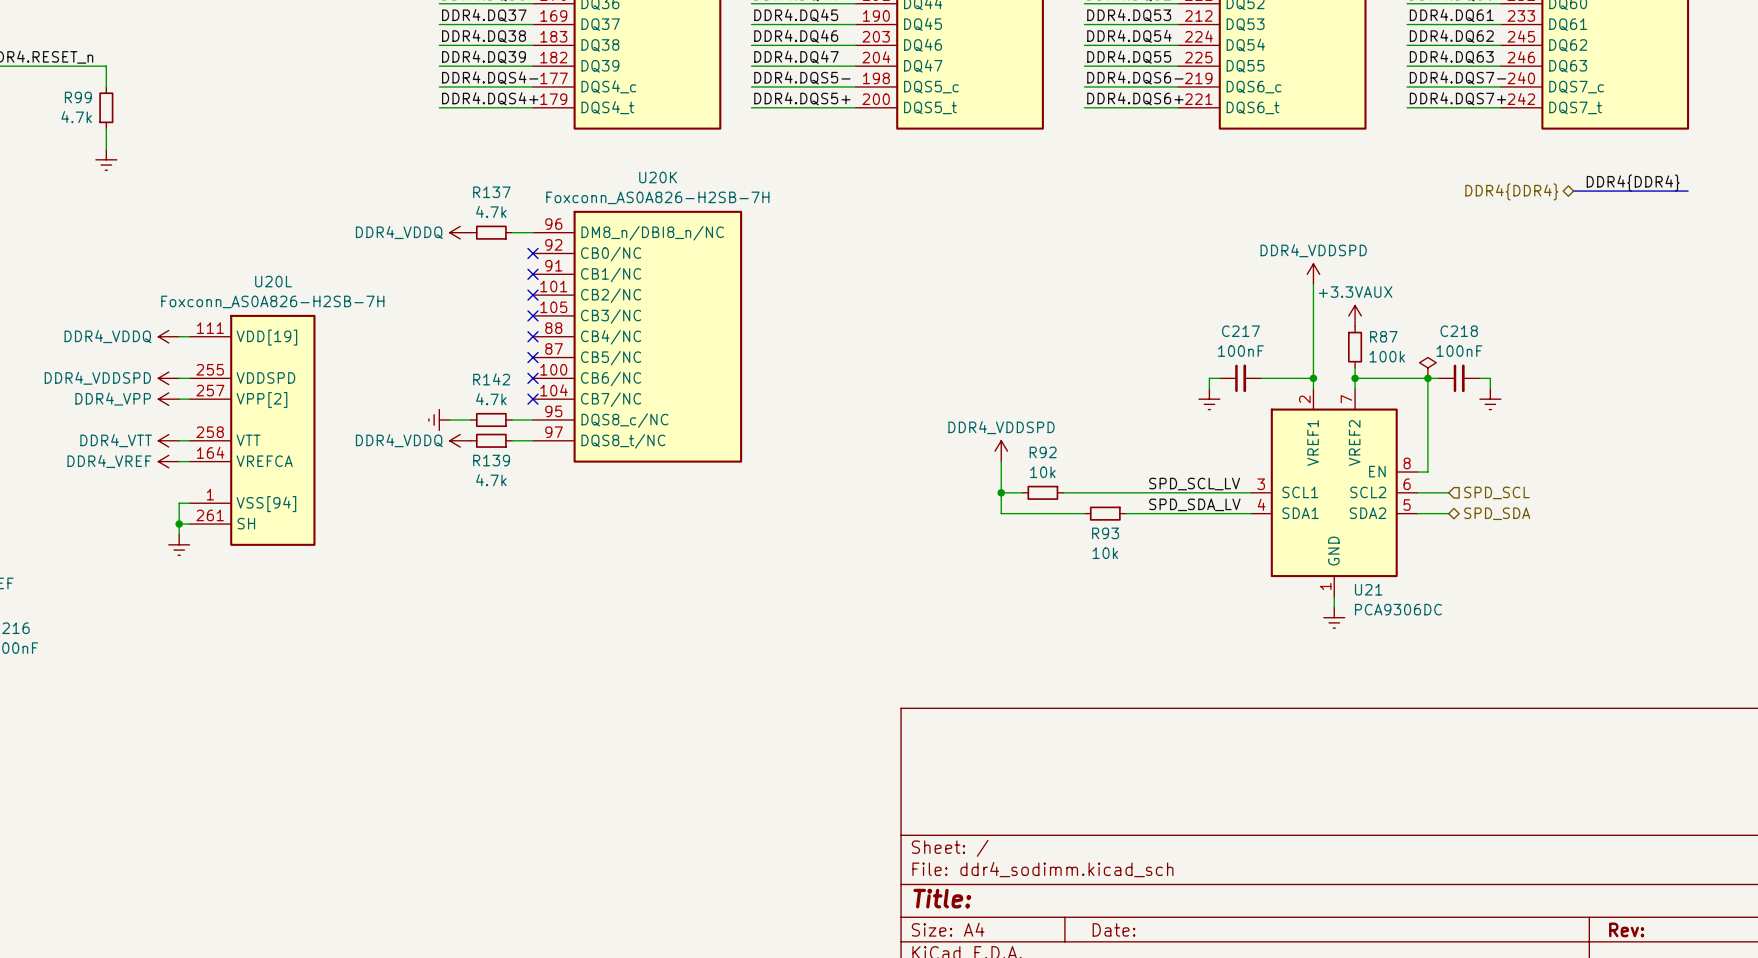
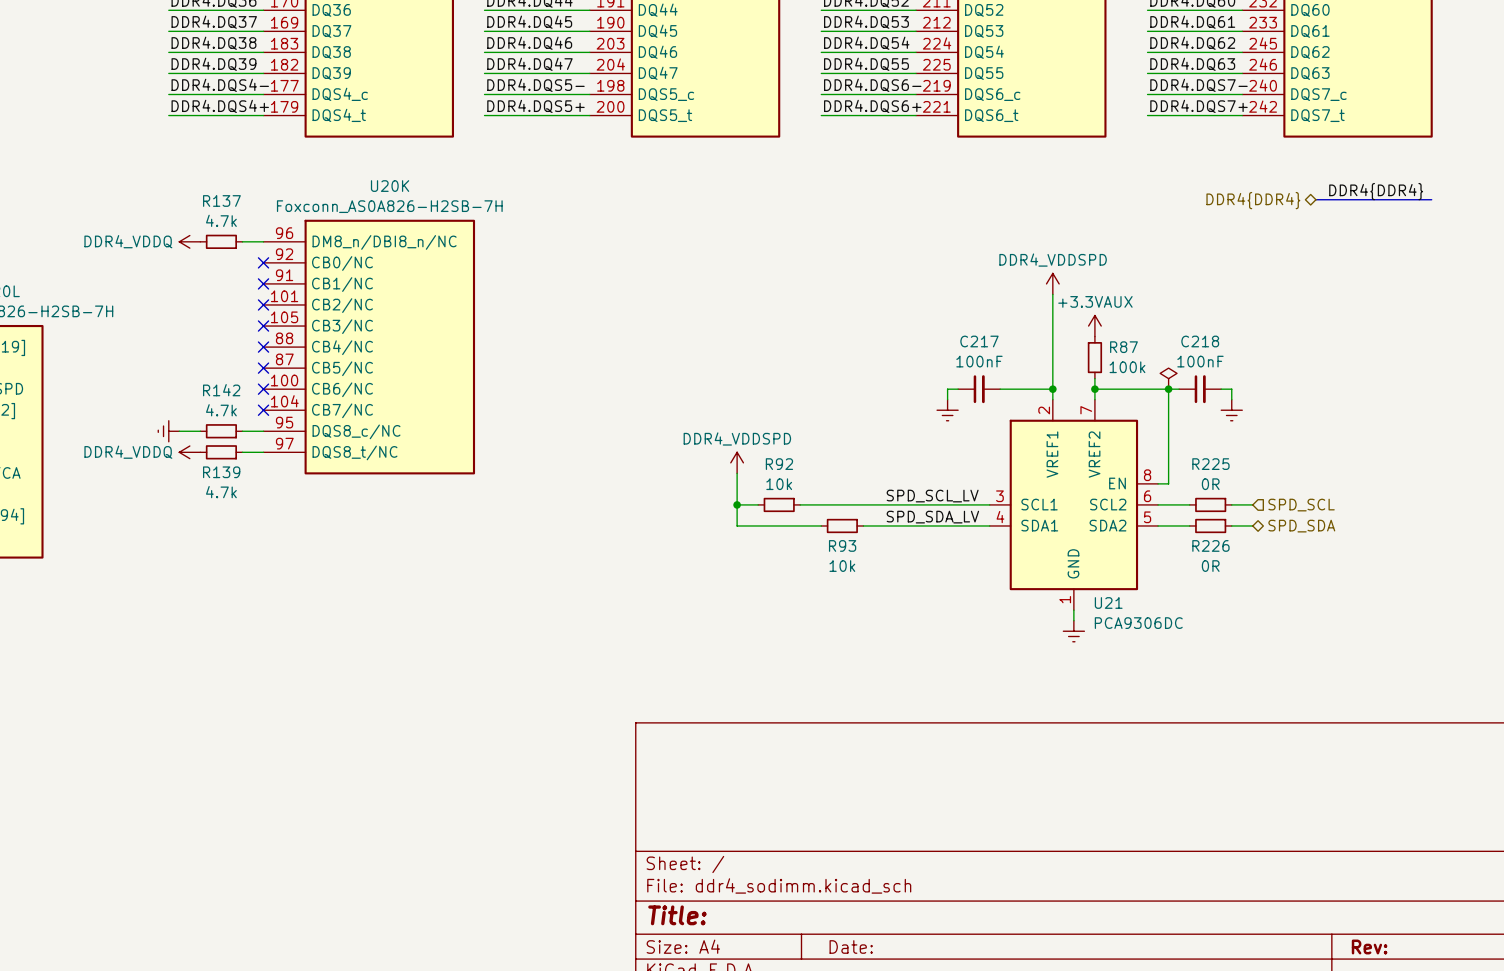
R225: none -> 0R (1210, 504)
wire: none -> (1231, 504) (1252, 504)
hierarchical label position: SPD_SCL (1496, 492) -> SPD_SCL (1301, 505)
R226: none -> 0R (1210, 525)
wire: none -> (1231, 525) (1252, 525)
hierarchical label position: SPD_SDA (1497, 513) -> SPD_SDA (1301, 526)

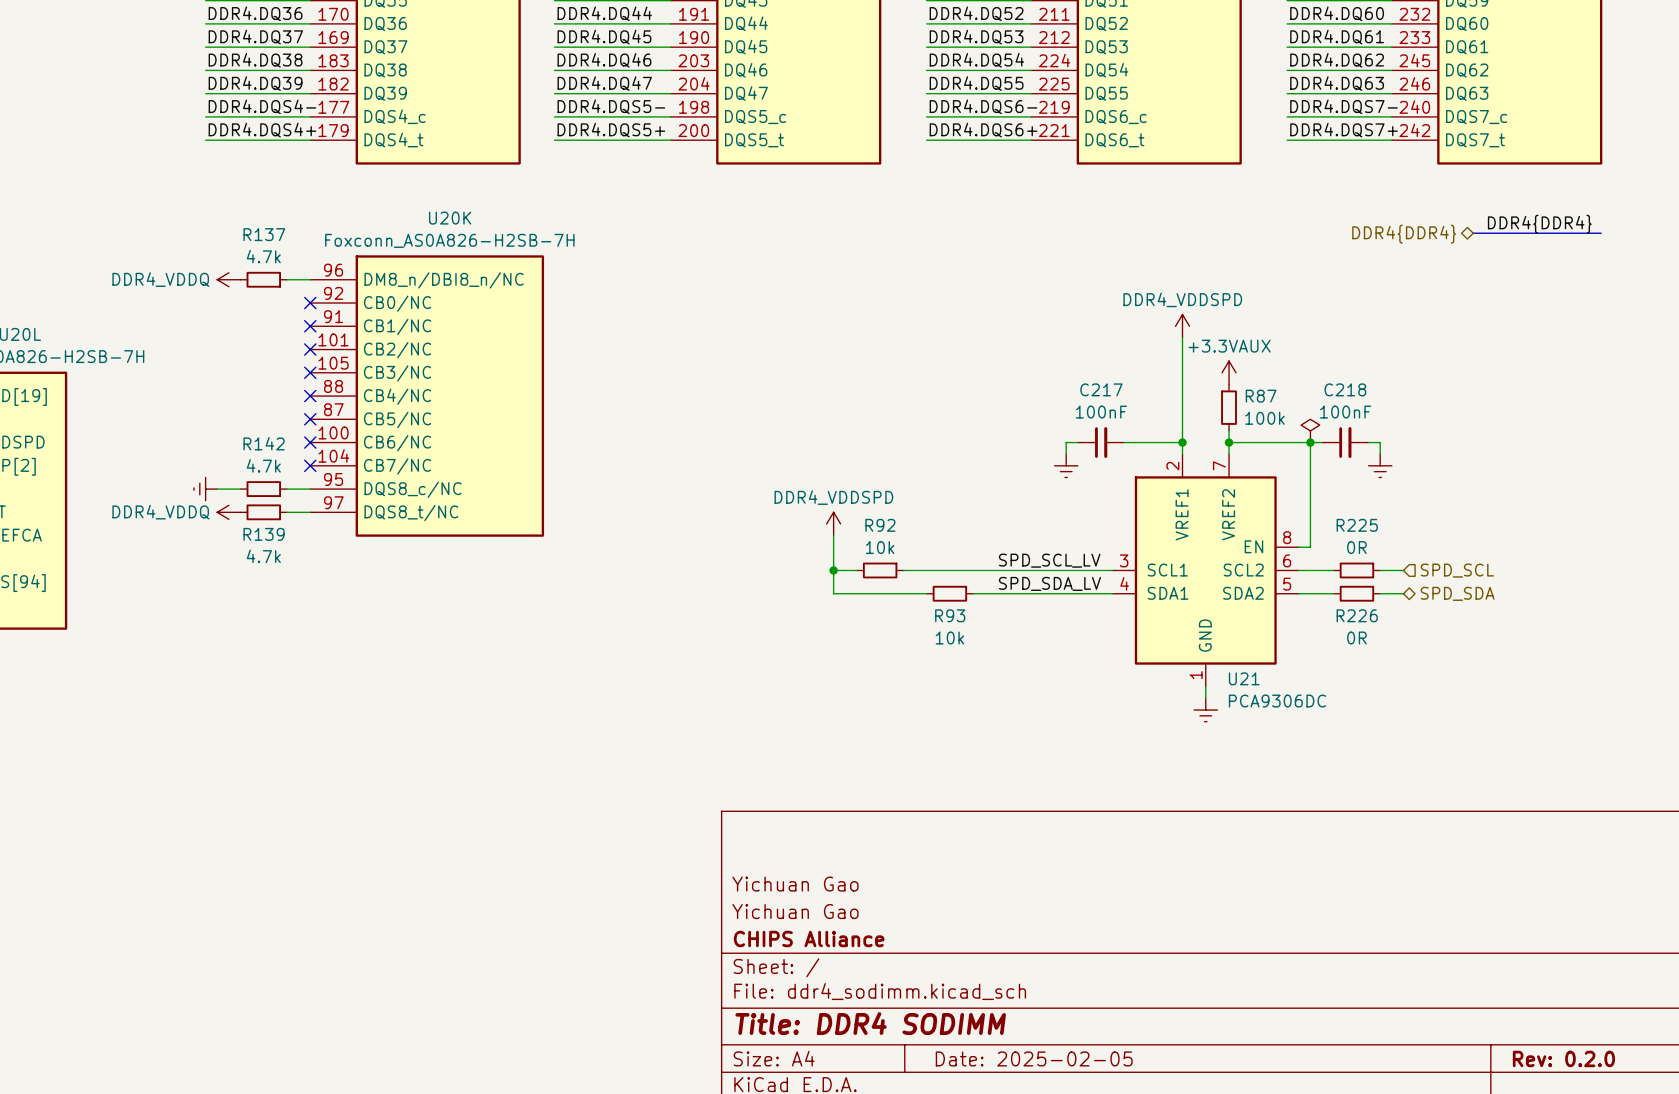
title block: none -> Yichuan Gao (795, 884)
title block: none -> Yichuan Gao (795, 911)
title block: none -> CHIPS Alliance (809, 938)
title block: Title: (677, 915) -> Title: DDR4 SODIMM (870, 1023)
title block: Date: (851, 946) -> Date: 2025-02-05 (1034, 1058)
title block: Rev: (1369, 946) -> Rev: 0.2.0 (1563, 1058)

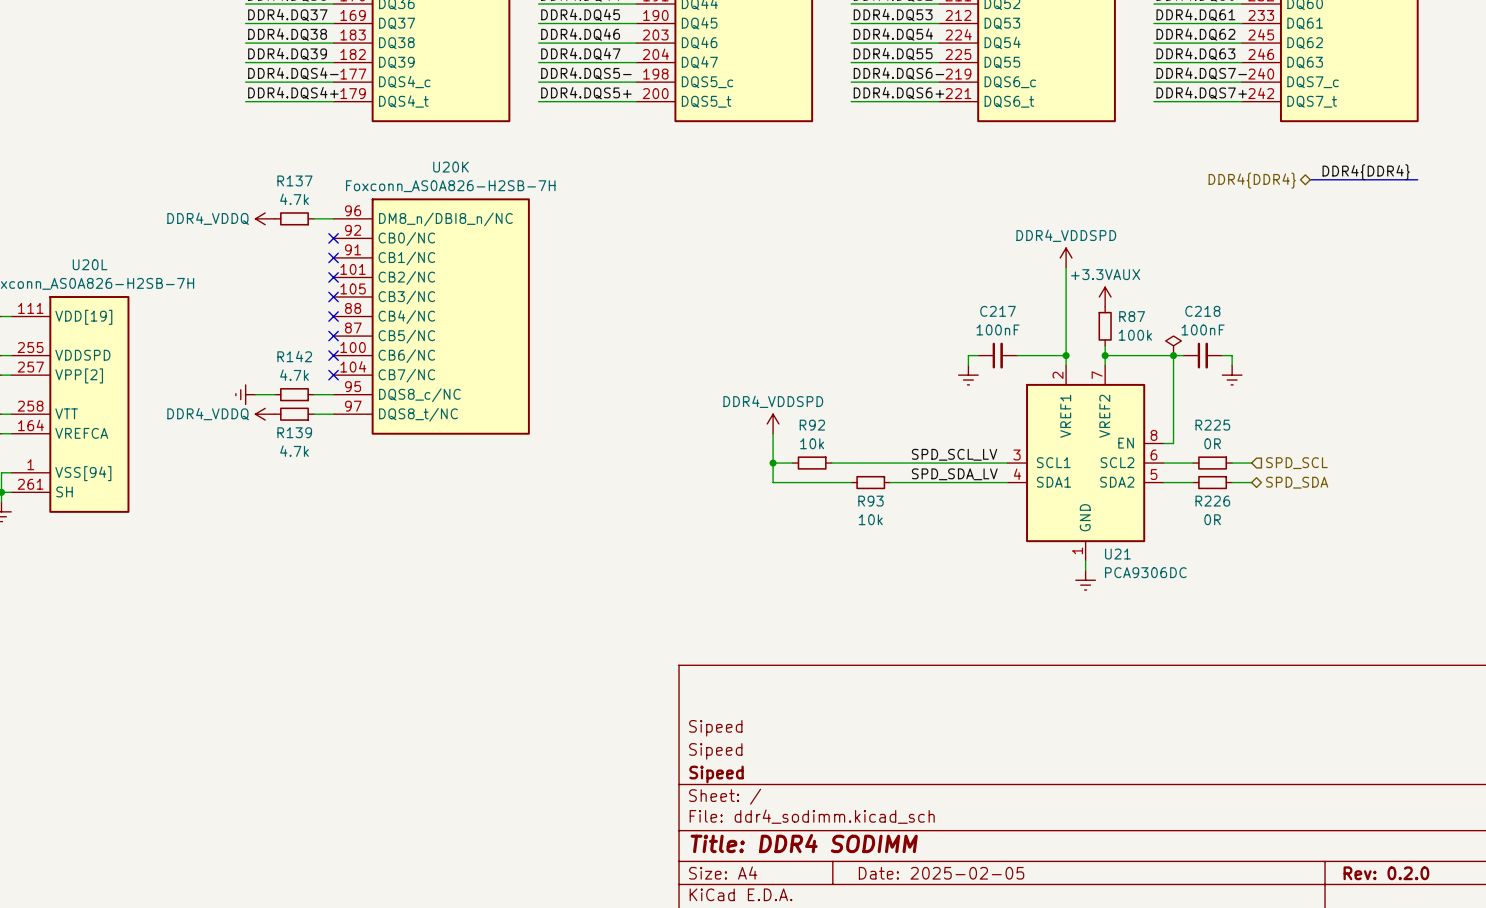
title block: Yichuan Gao (795, 884) -> Sipeed (715, 728)
title block: Yichuan Gao (795, 911) -> Sipeed (715, 751)
title block: CHIPS Alliance (809, 938) -> Sipeed (716, 774)

